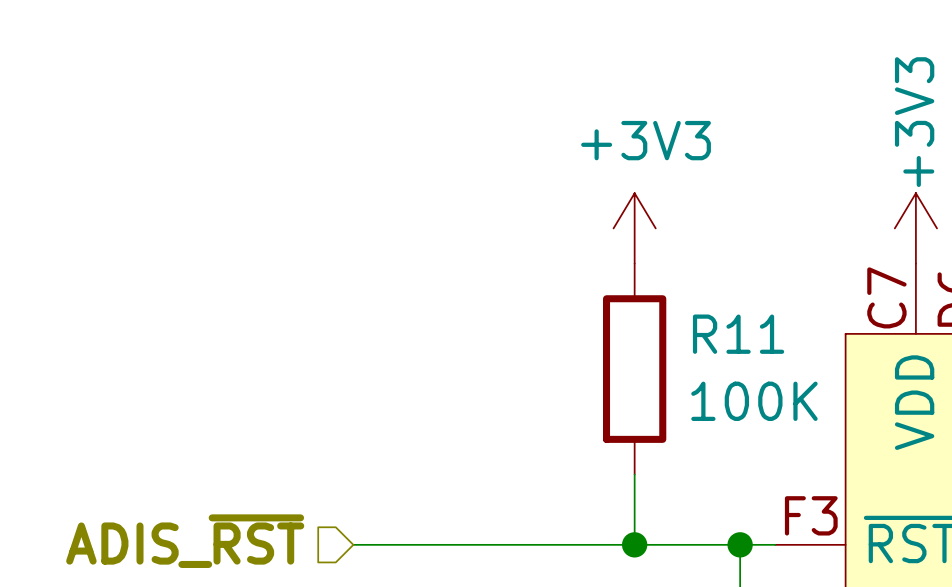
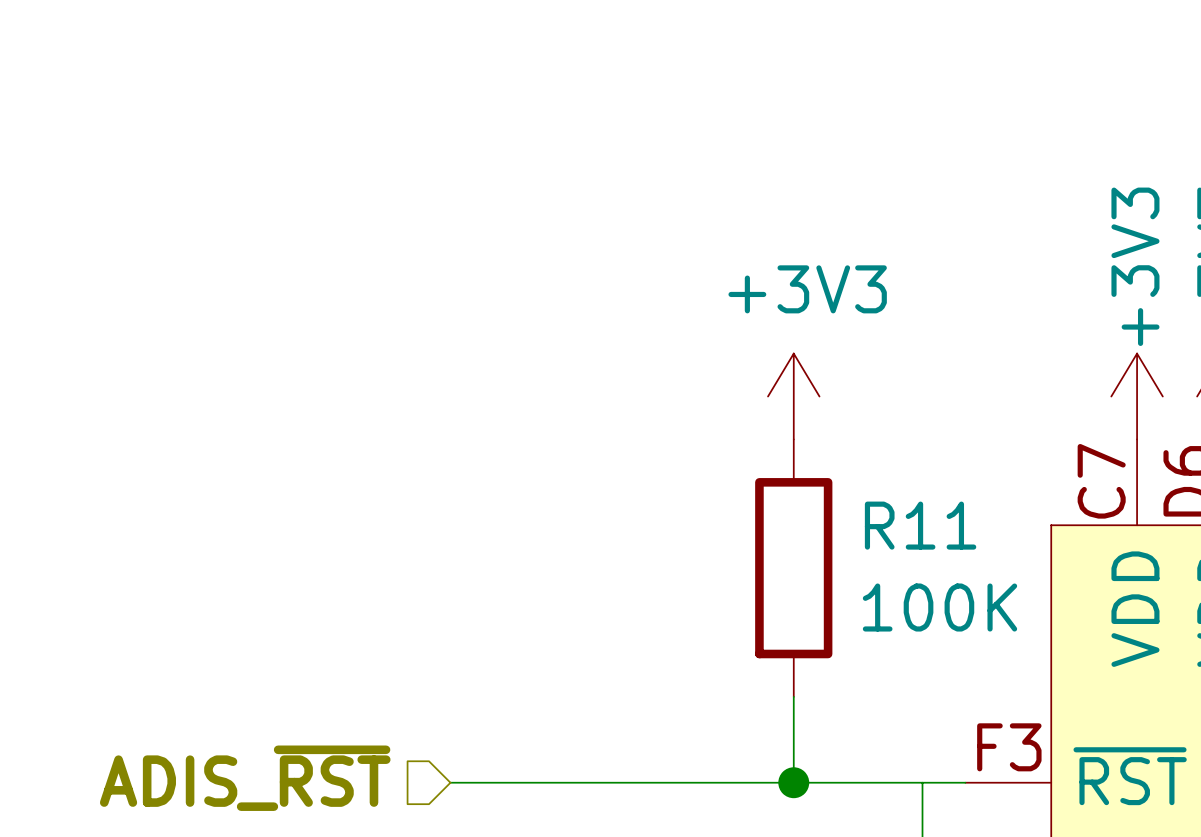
junction: (740, 544) -> none

